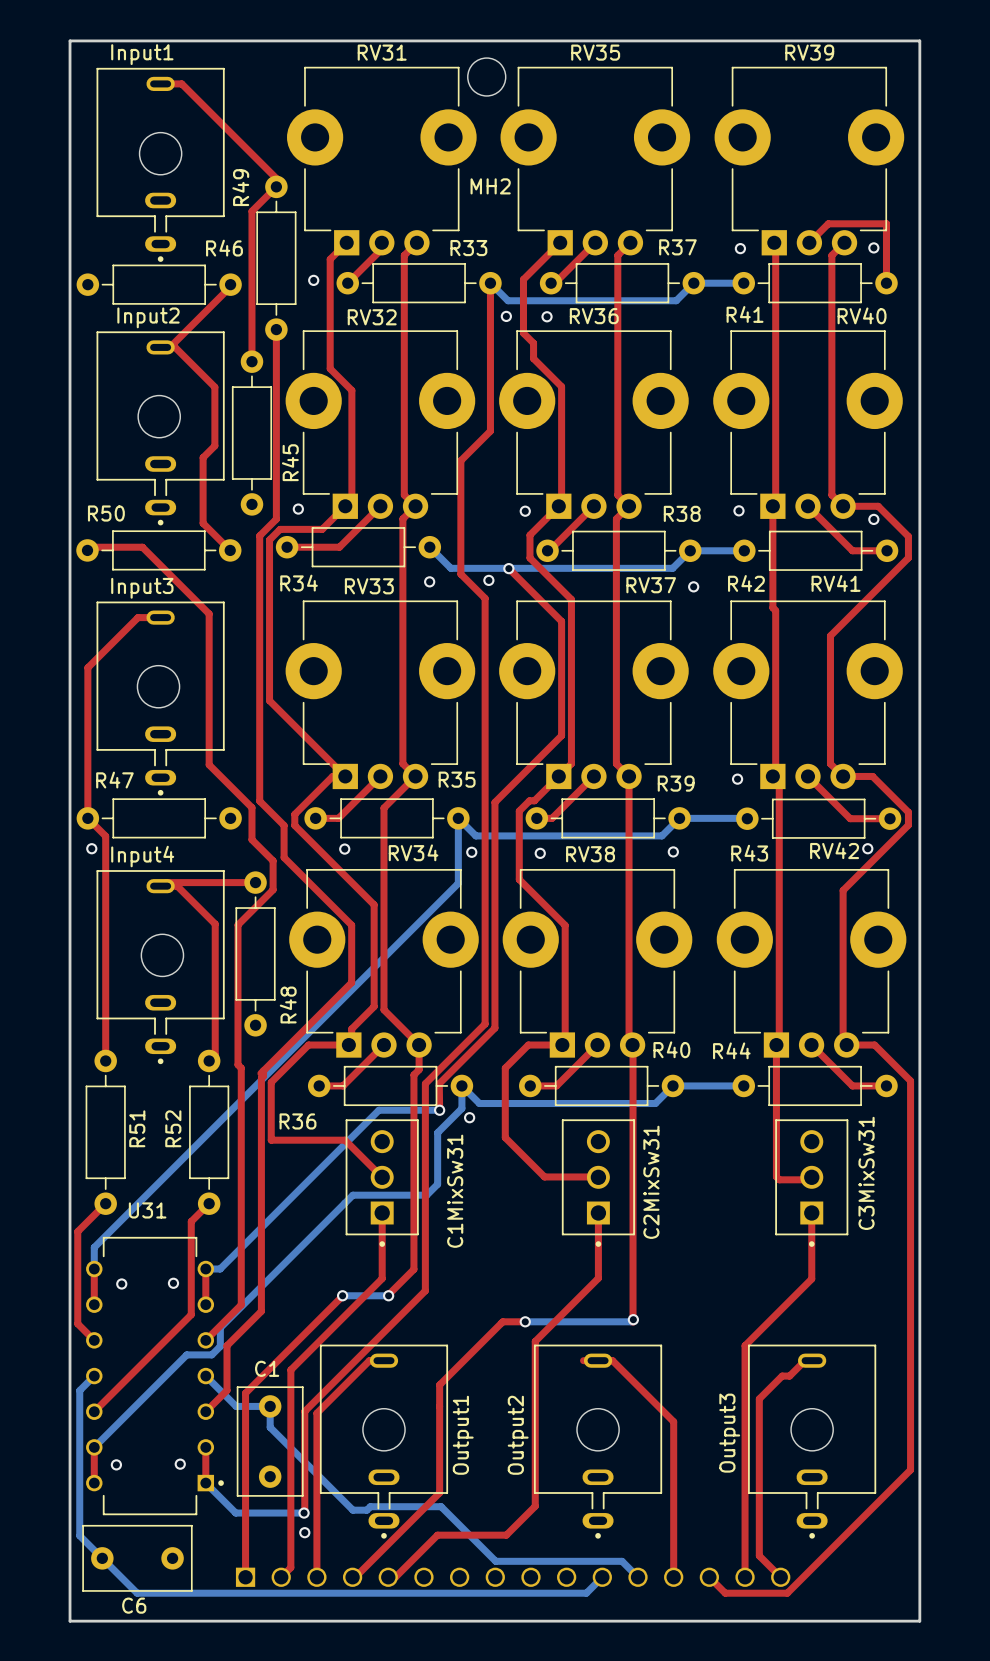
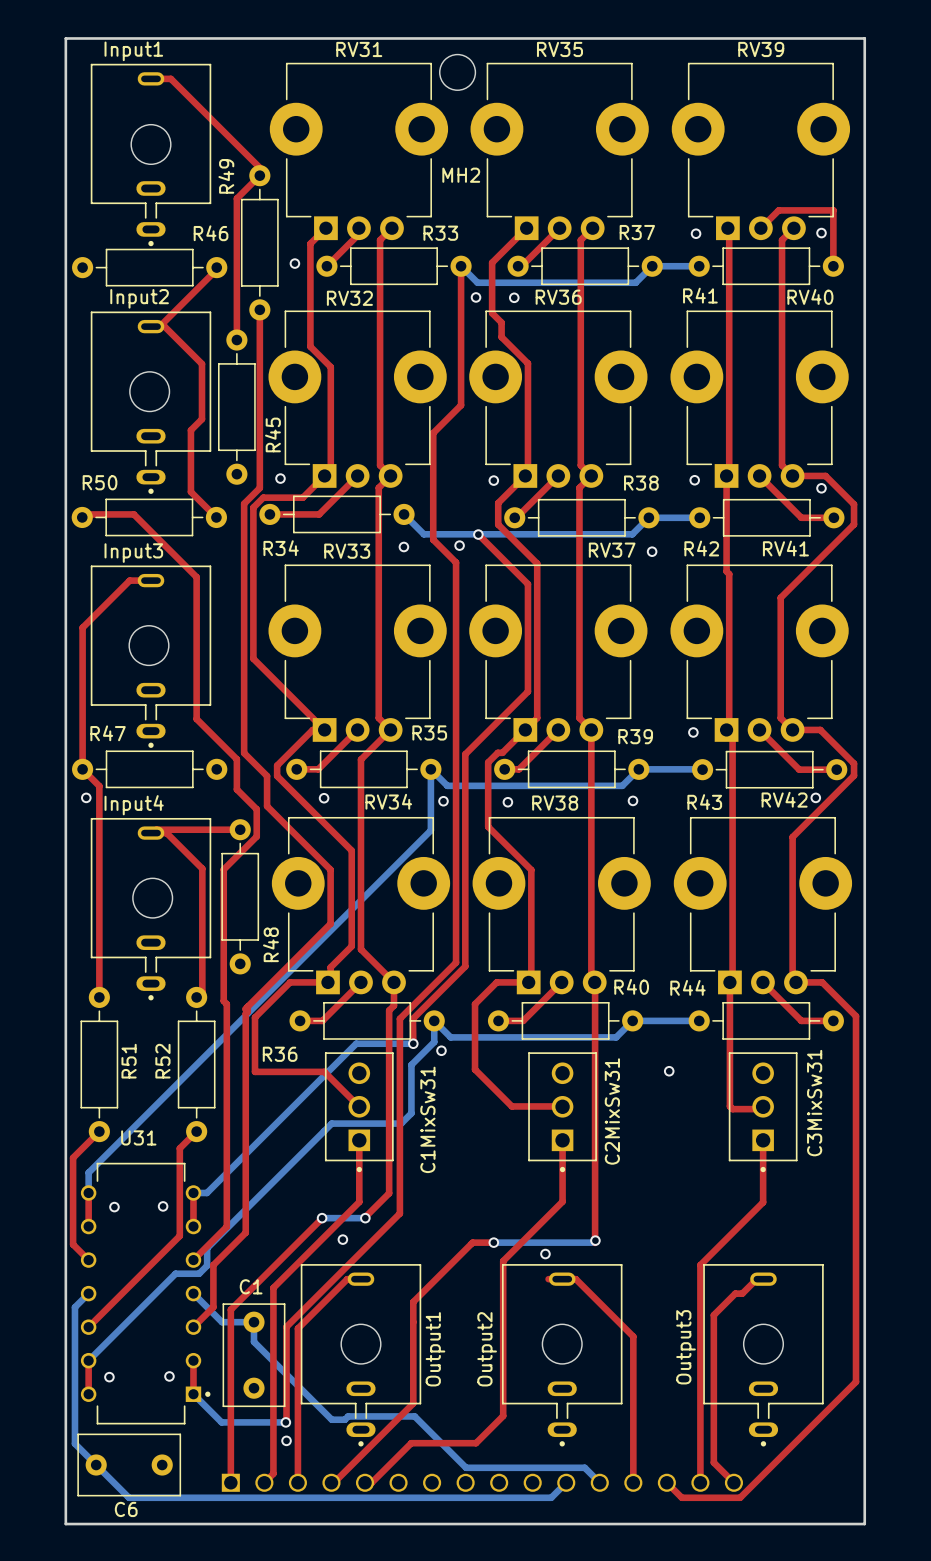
via: none -> (669, 1071)
via: none -> (342, 1239)
via: none -> (545, 1254)

